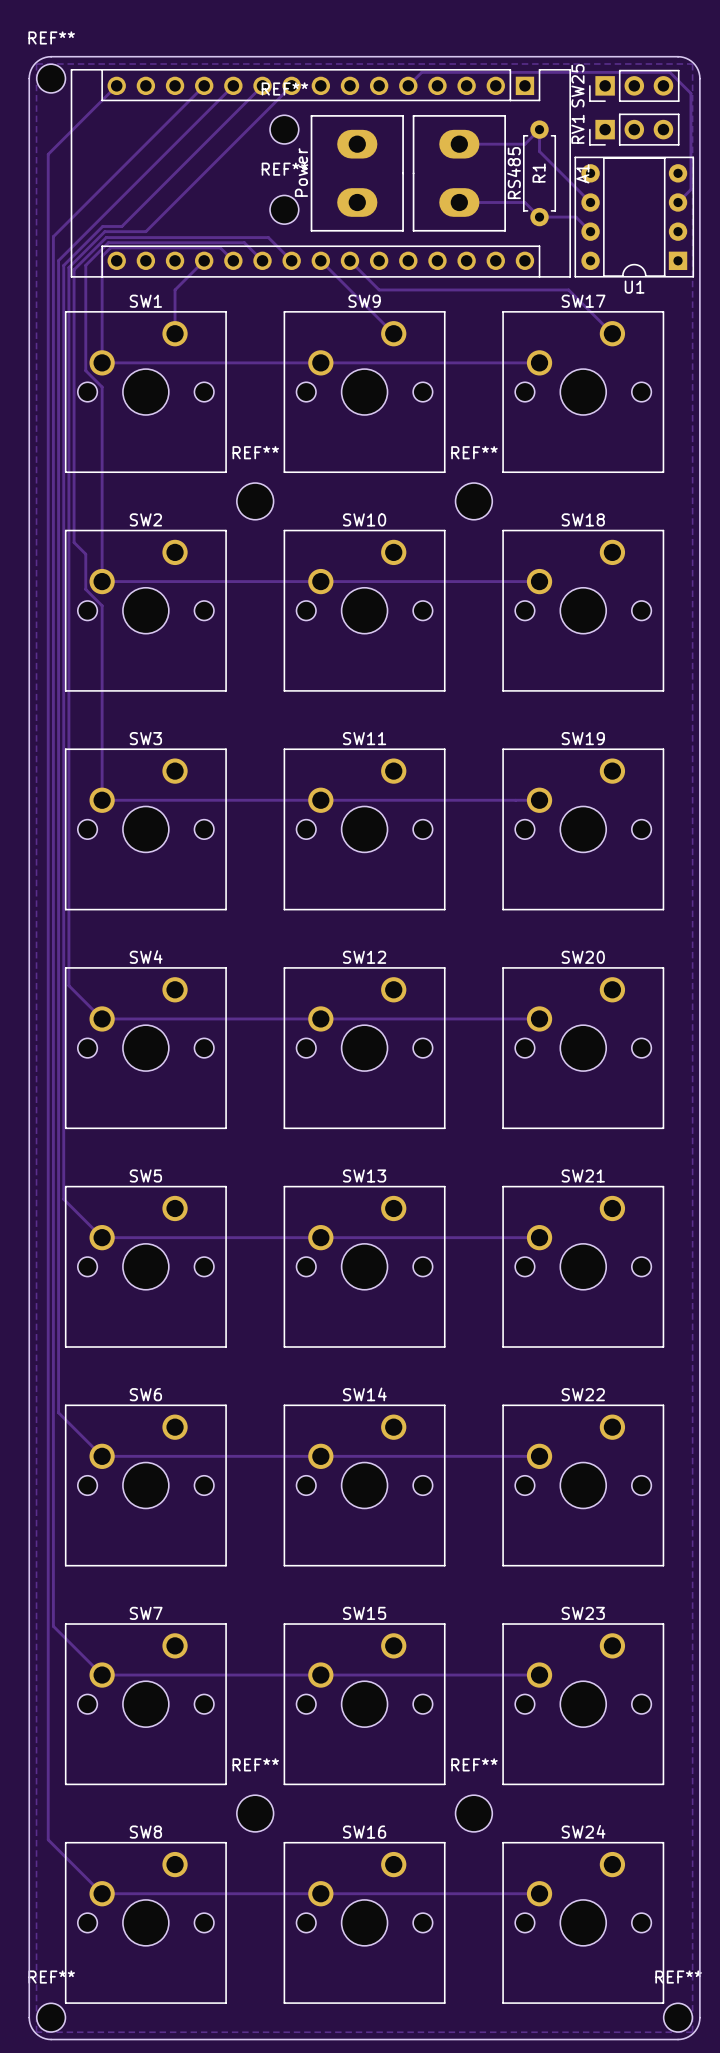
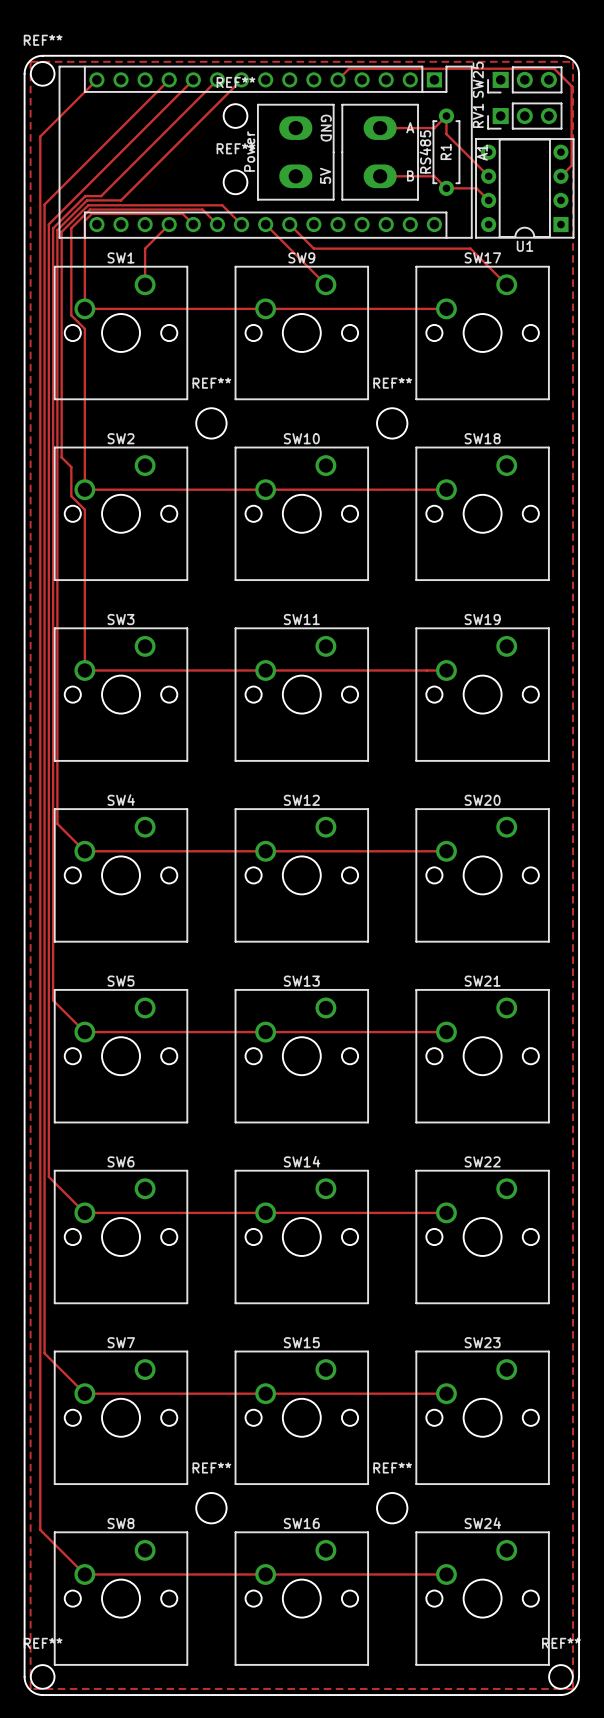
text: none -> A (410, 127)
text: none -> GND (326, 128)
text: none -> 5V (325, 175)
text: none -> B (410, 175)

